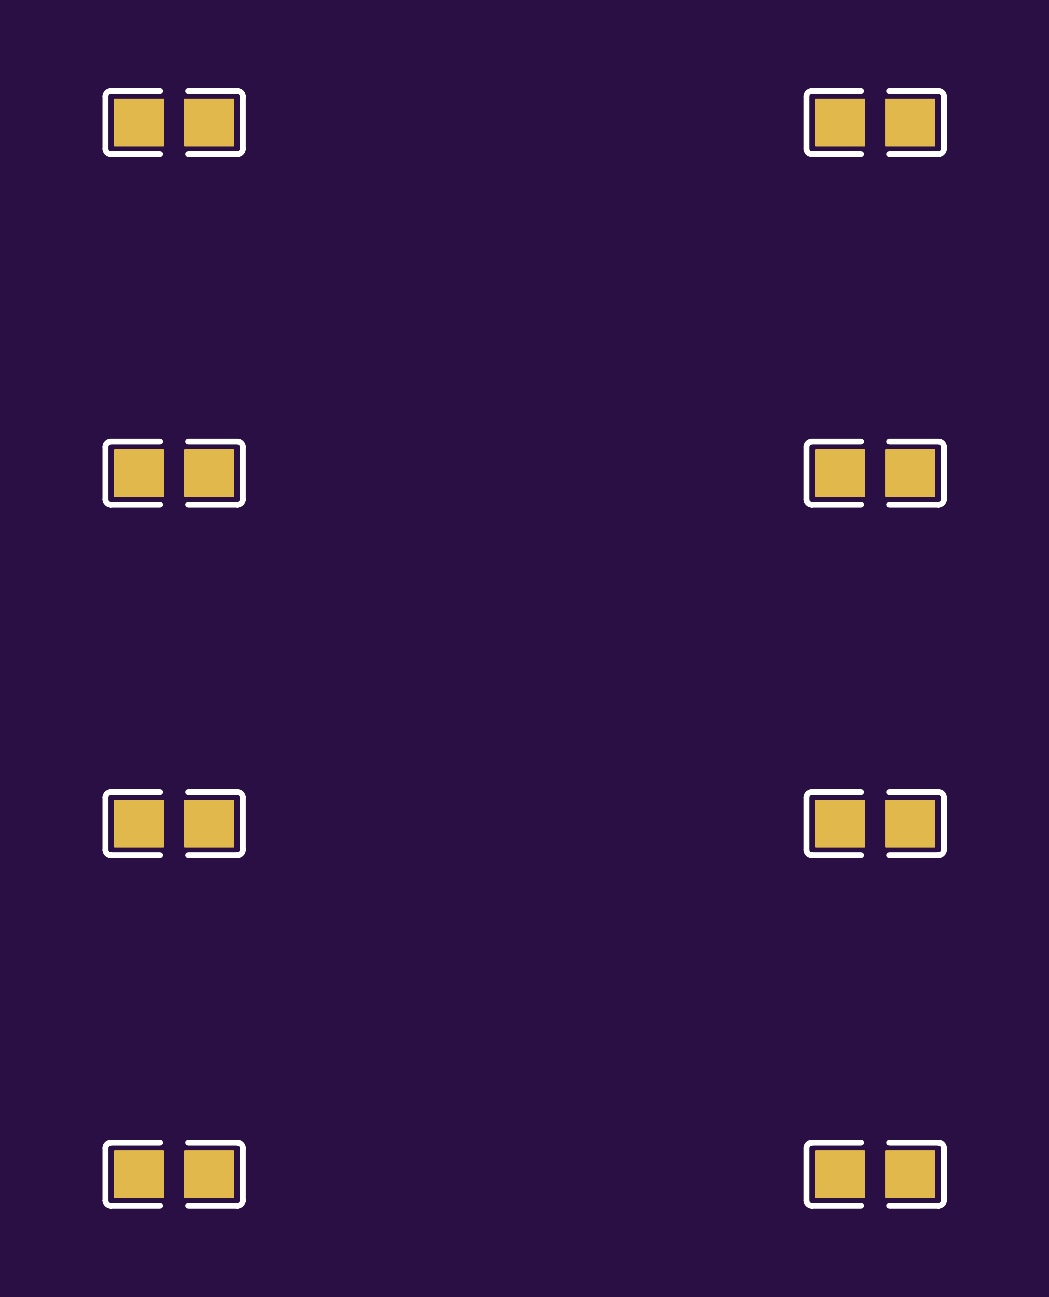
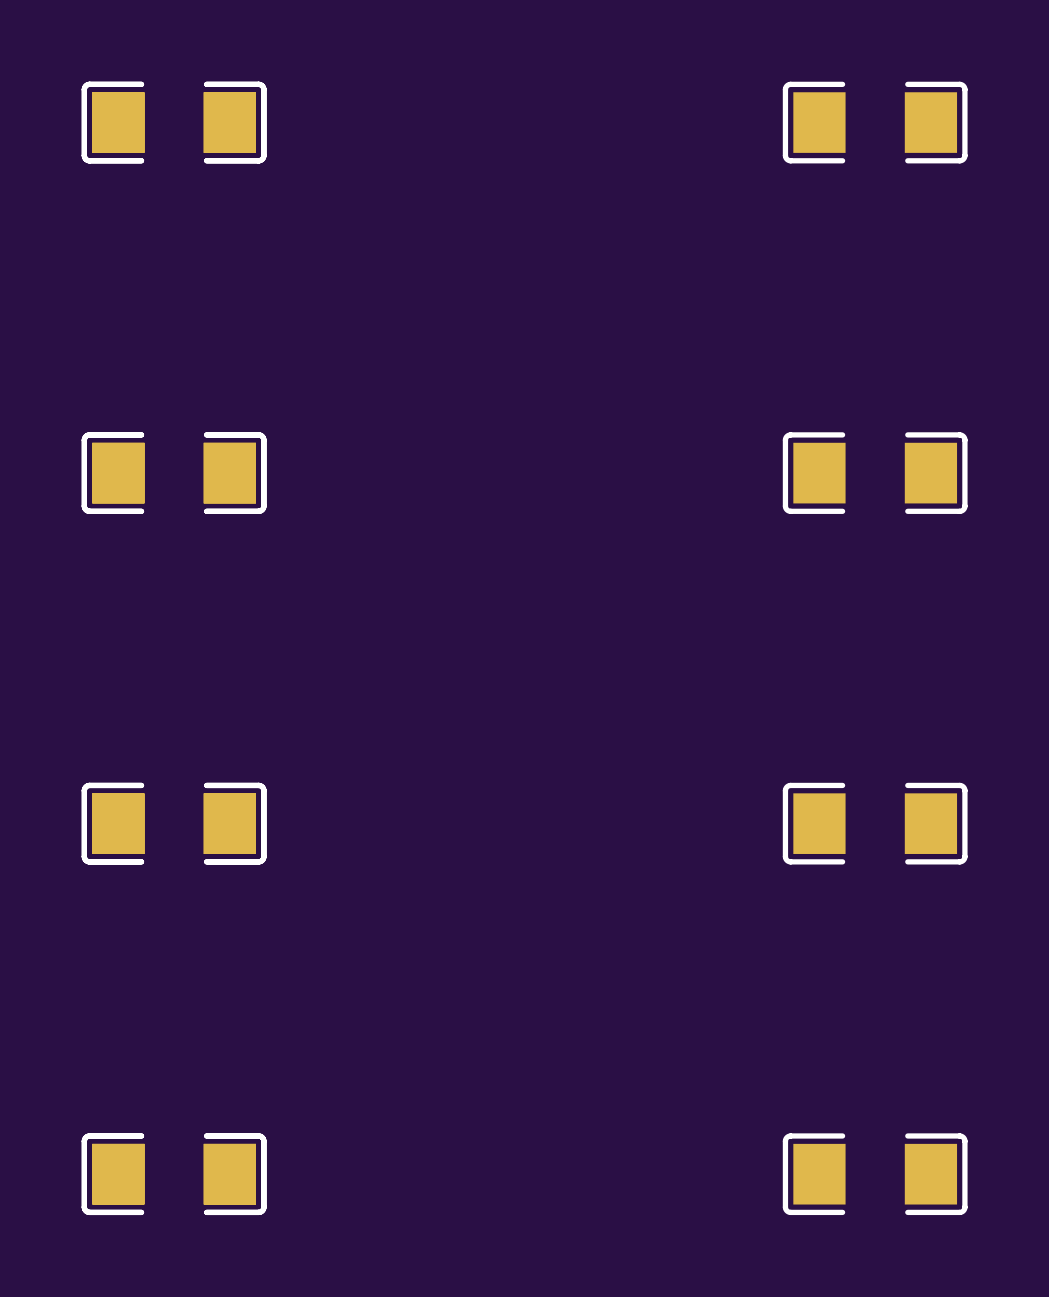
part footprint: [102, 88, 246, 157] -> [81, 81, 267, 164]
part footprint: [803, 88, 947, 157] -> [782, 81, 968, 164]
part footprint: [102, 438, 246, 508] -> [81, 432, 267, 514]
part footprint: [803, 438, 947, 508] -> [782, 432, 968, 514]
part footprint: [102, 789, 246, 858] -> [81, 782, 267, 865]
part footprint: [803, 789, 947, 858] -> [782, 782, 968, 865]
part footprint: [102, 1140, 246, 1209] -> [81, 1133, 267, 1216]
part footprint: [803, 1140, 947, 1209] -> [782, 1133, 968, 1216]

